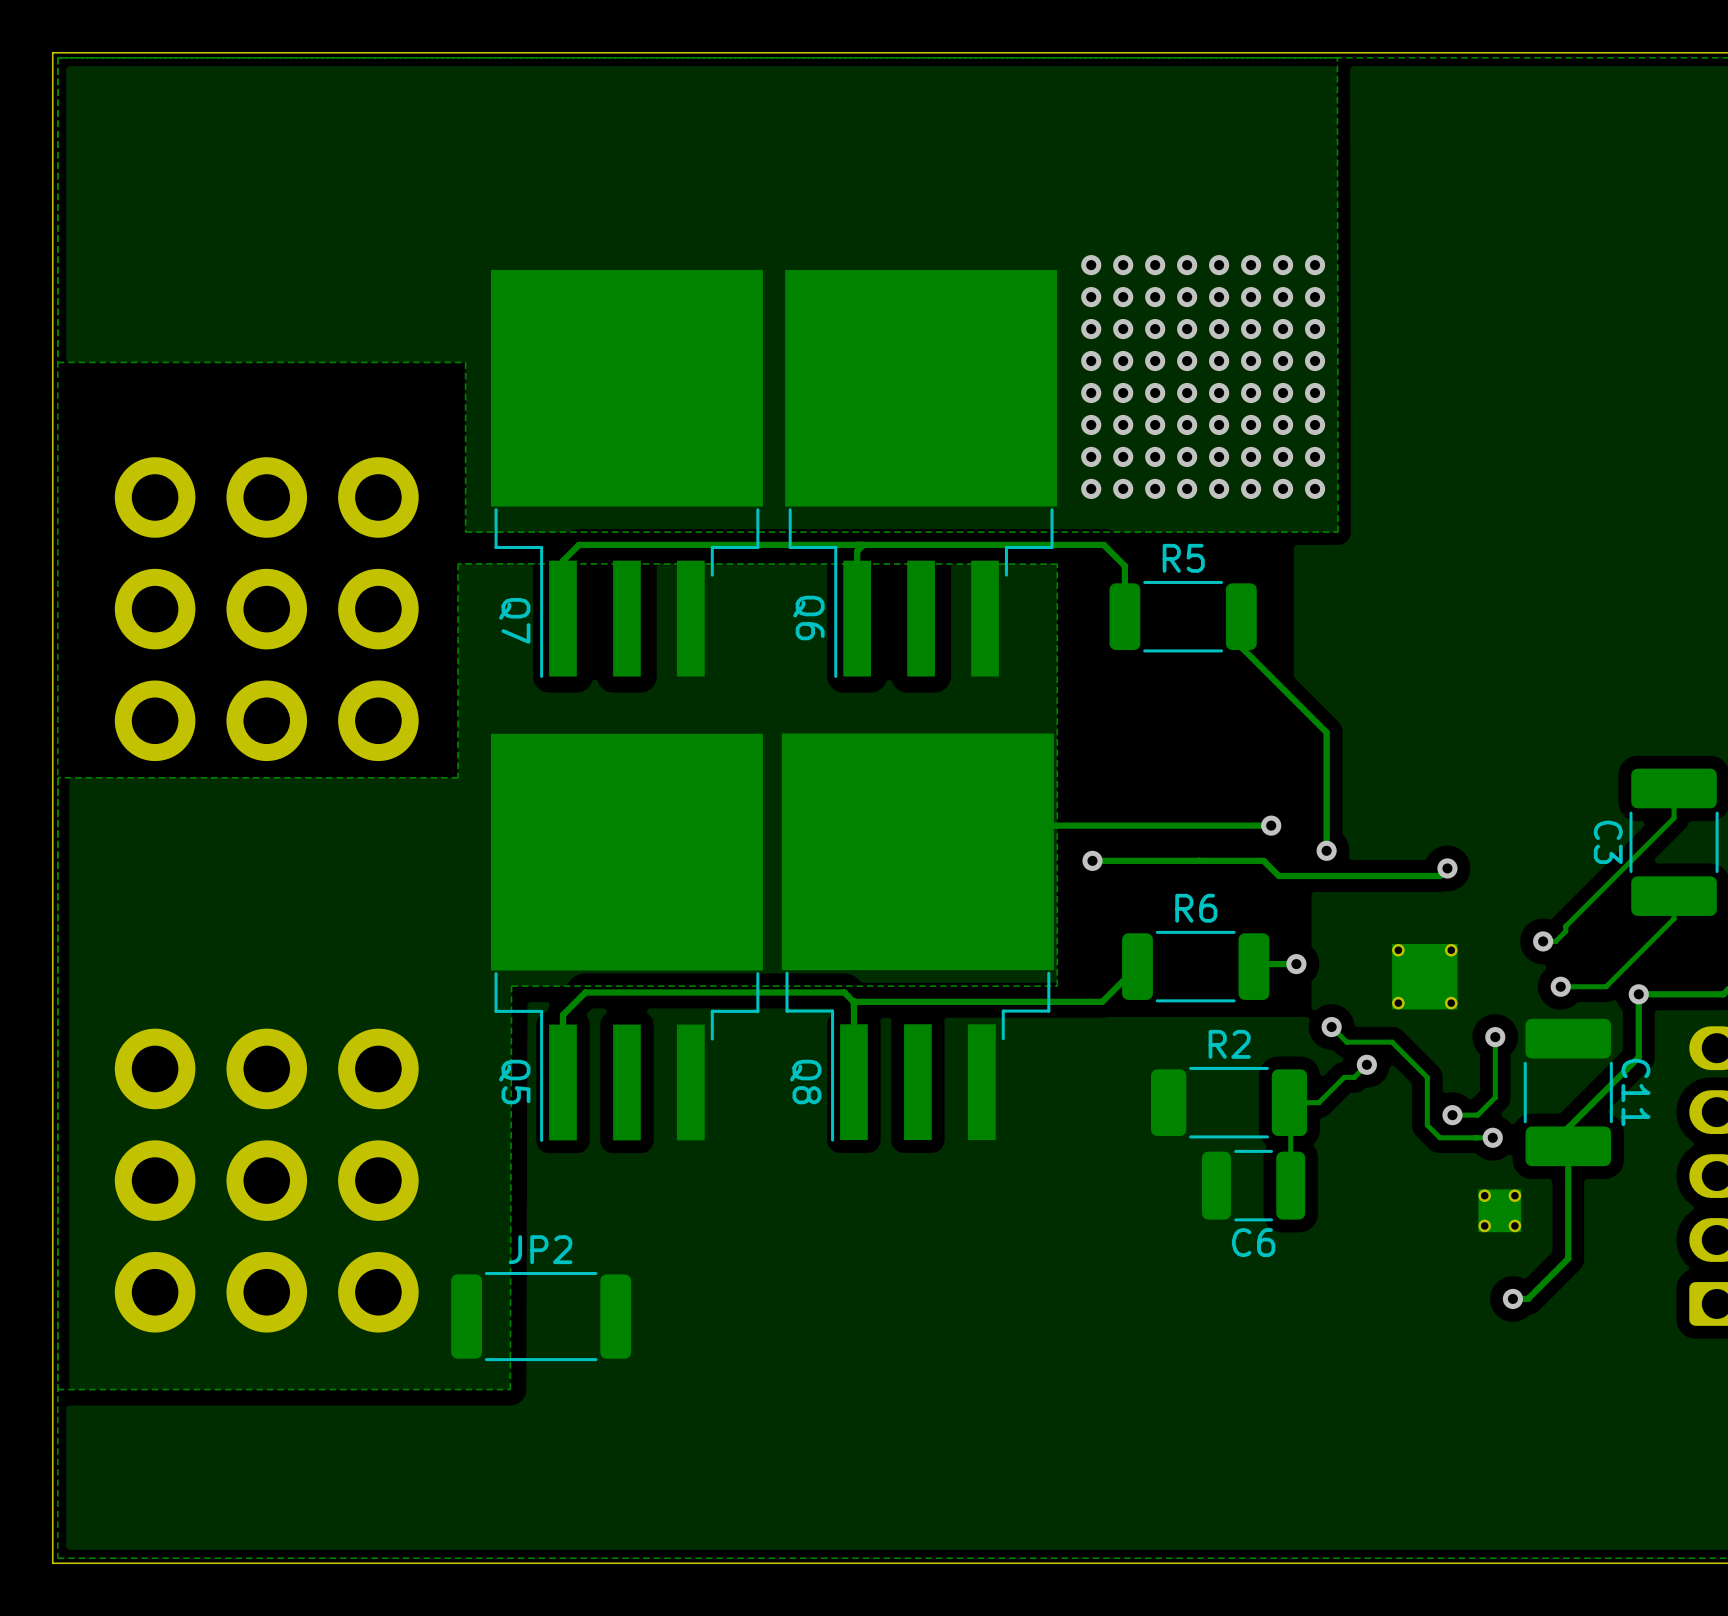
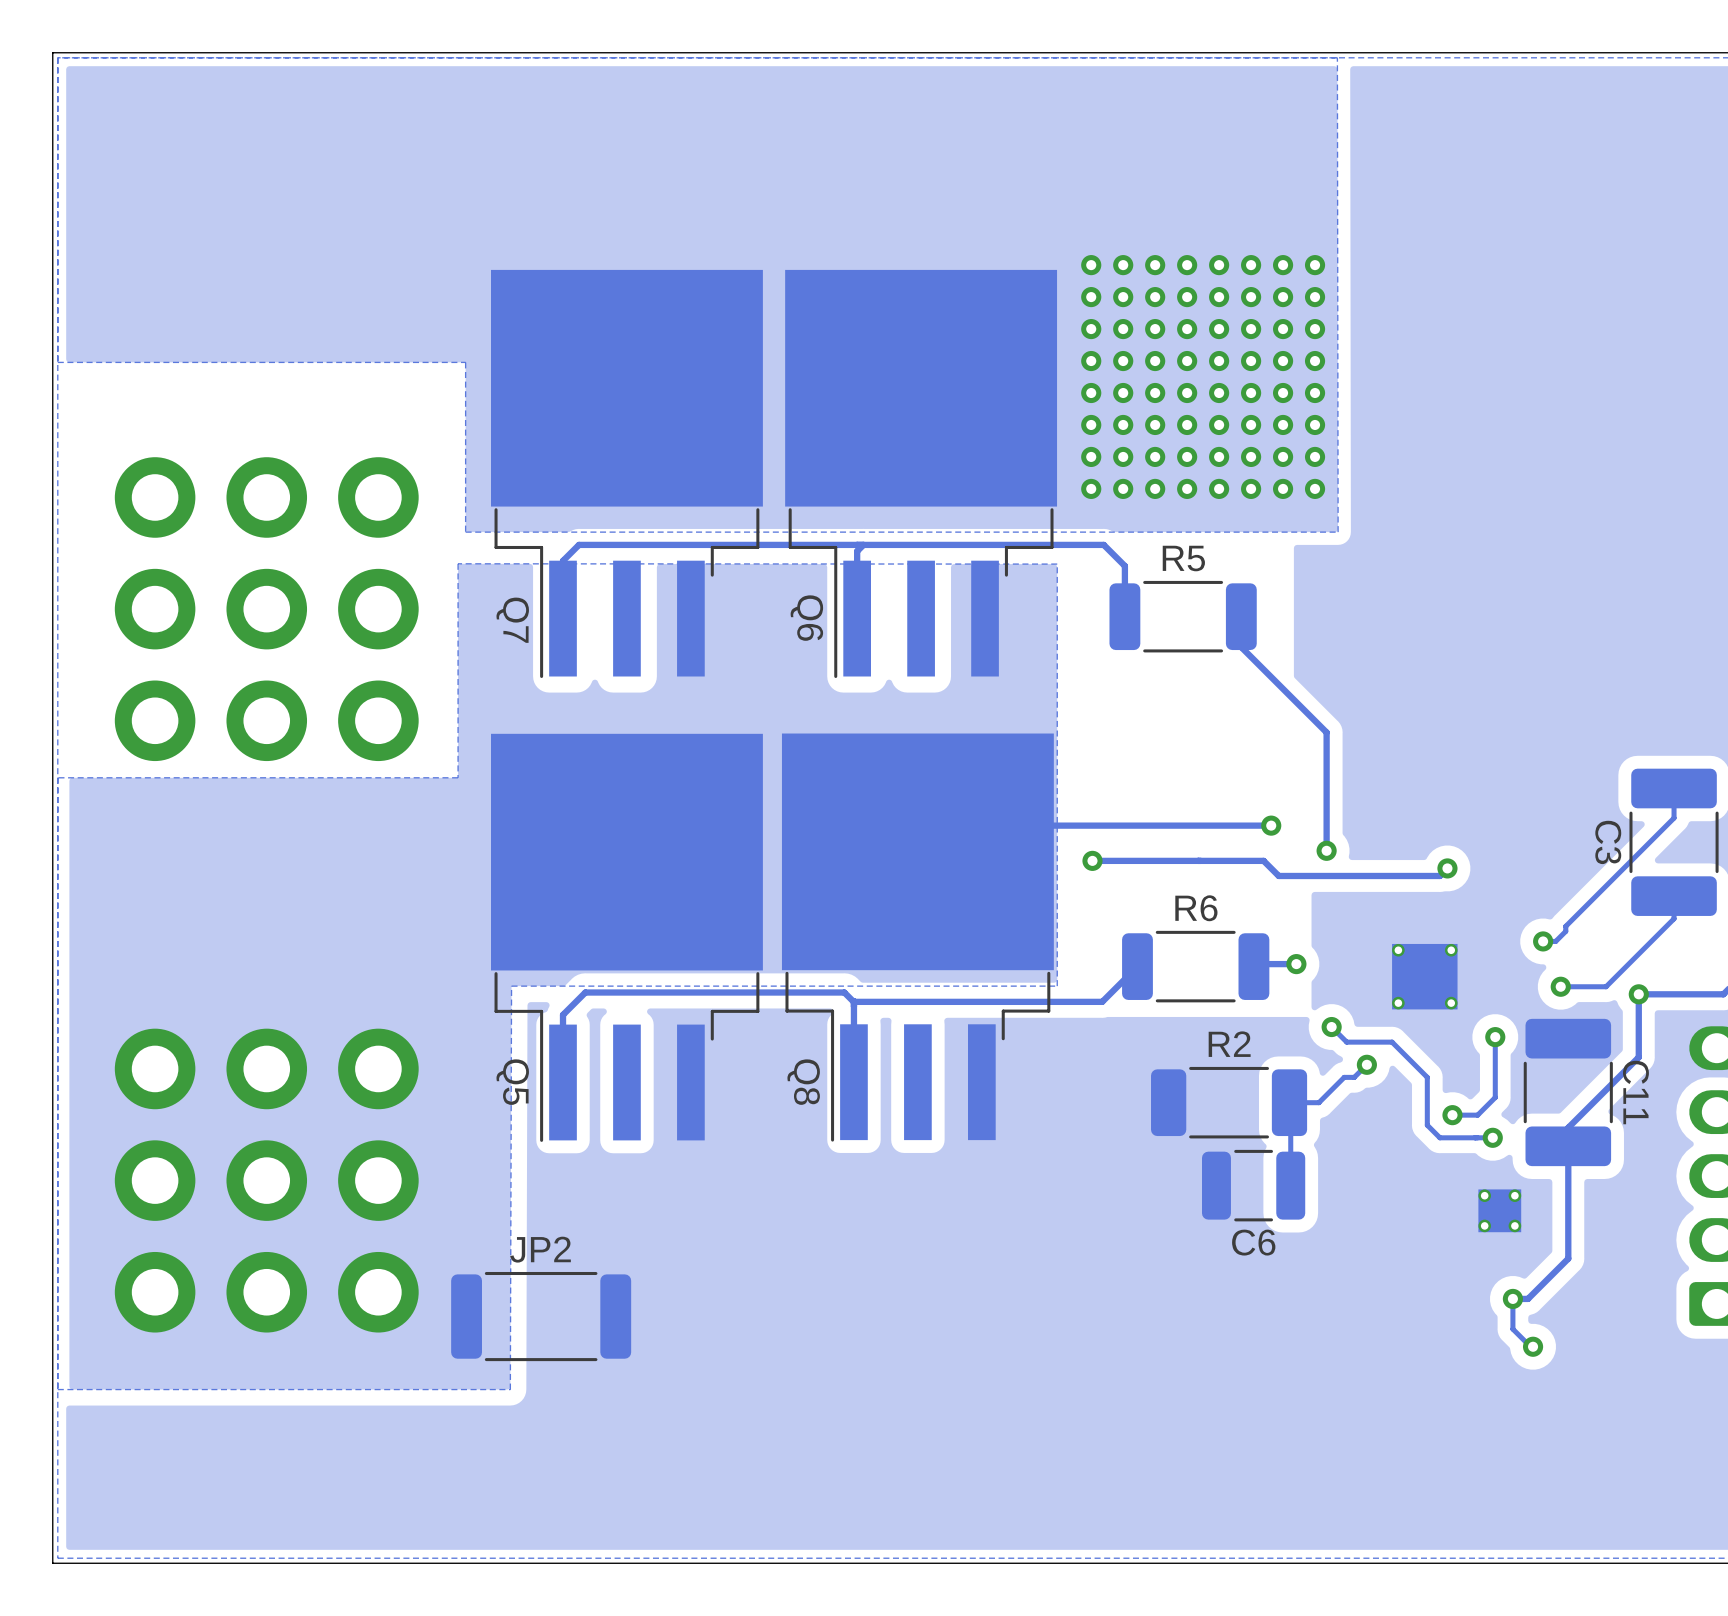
track: none -> (1512, 1298) (1512, 1329) (1530, 1346) (1533, 1346)
via: none -> (1533, 1346)

